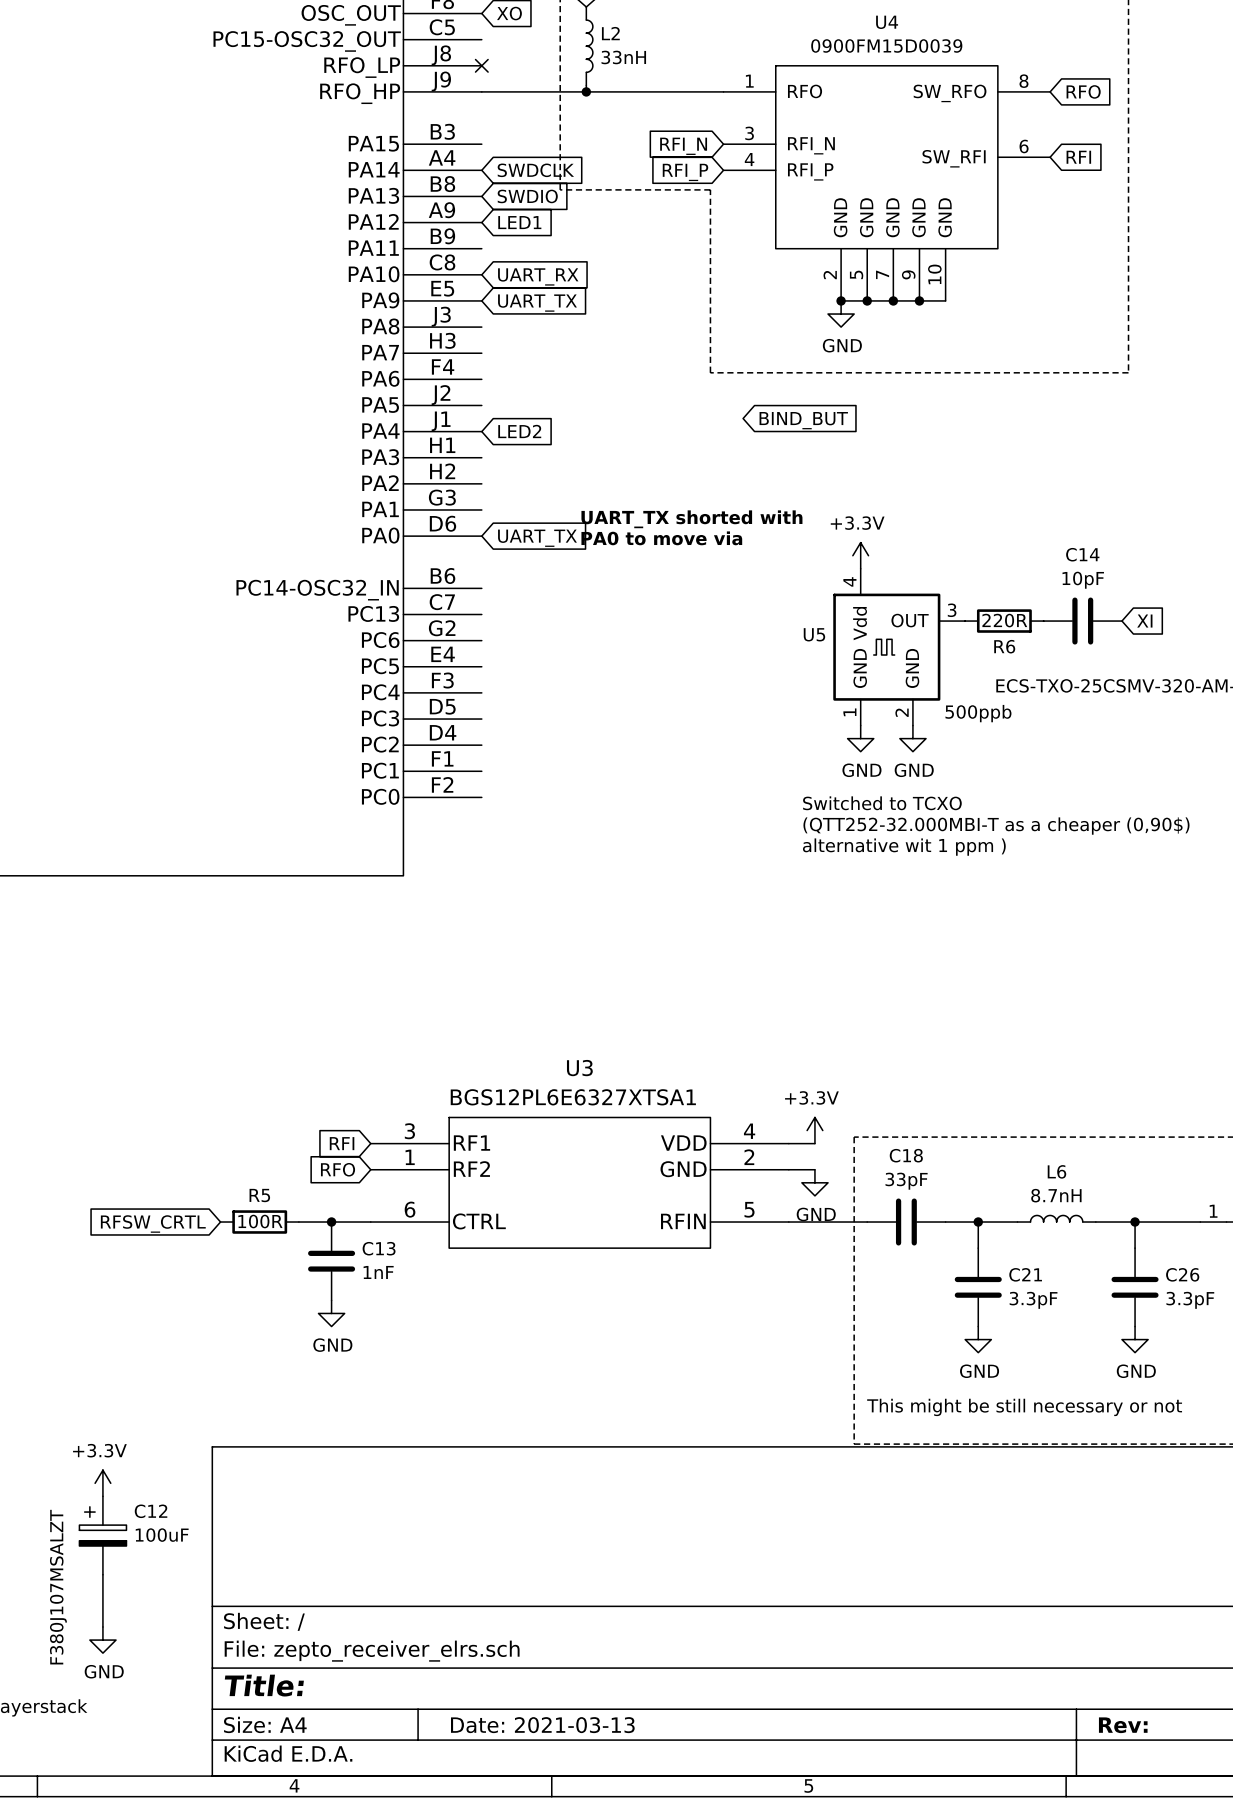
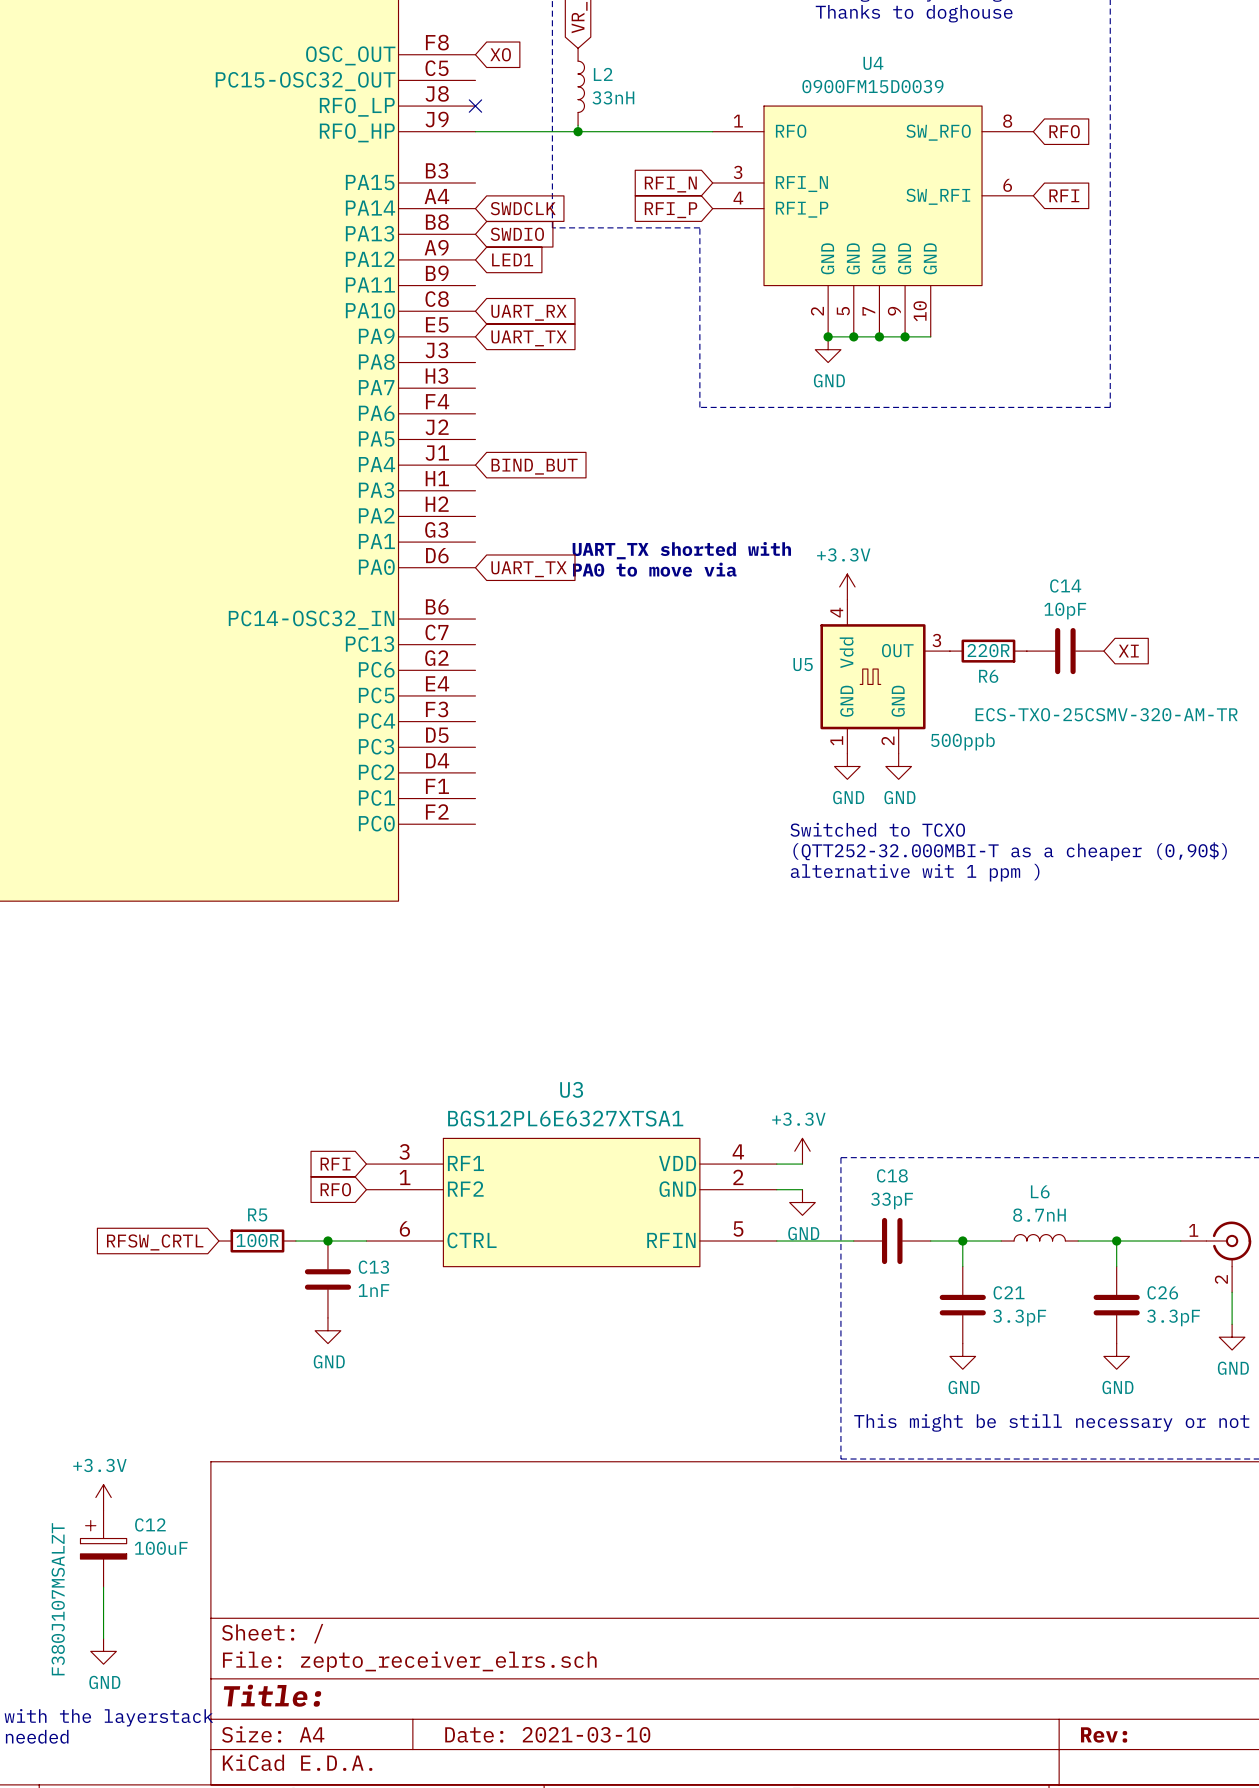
global label: BIND_BUT (803, 420) -> none
global label: LED2 (519, 431) -> BIND_BUT (534, 466)
title block: Date: 2021-03-13 (542, 1725) -> Date: 2021-03-10 (547, 1734)

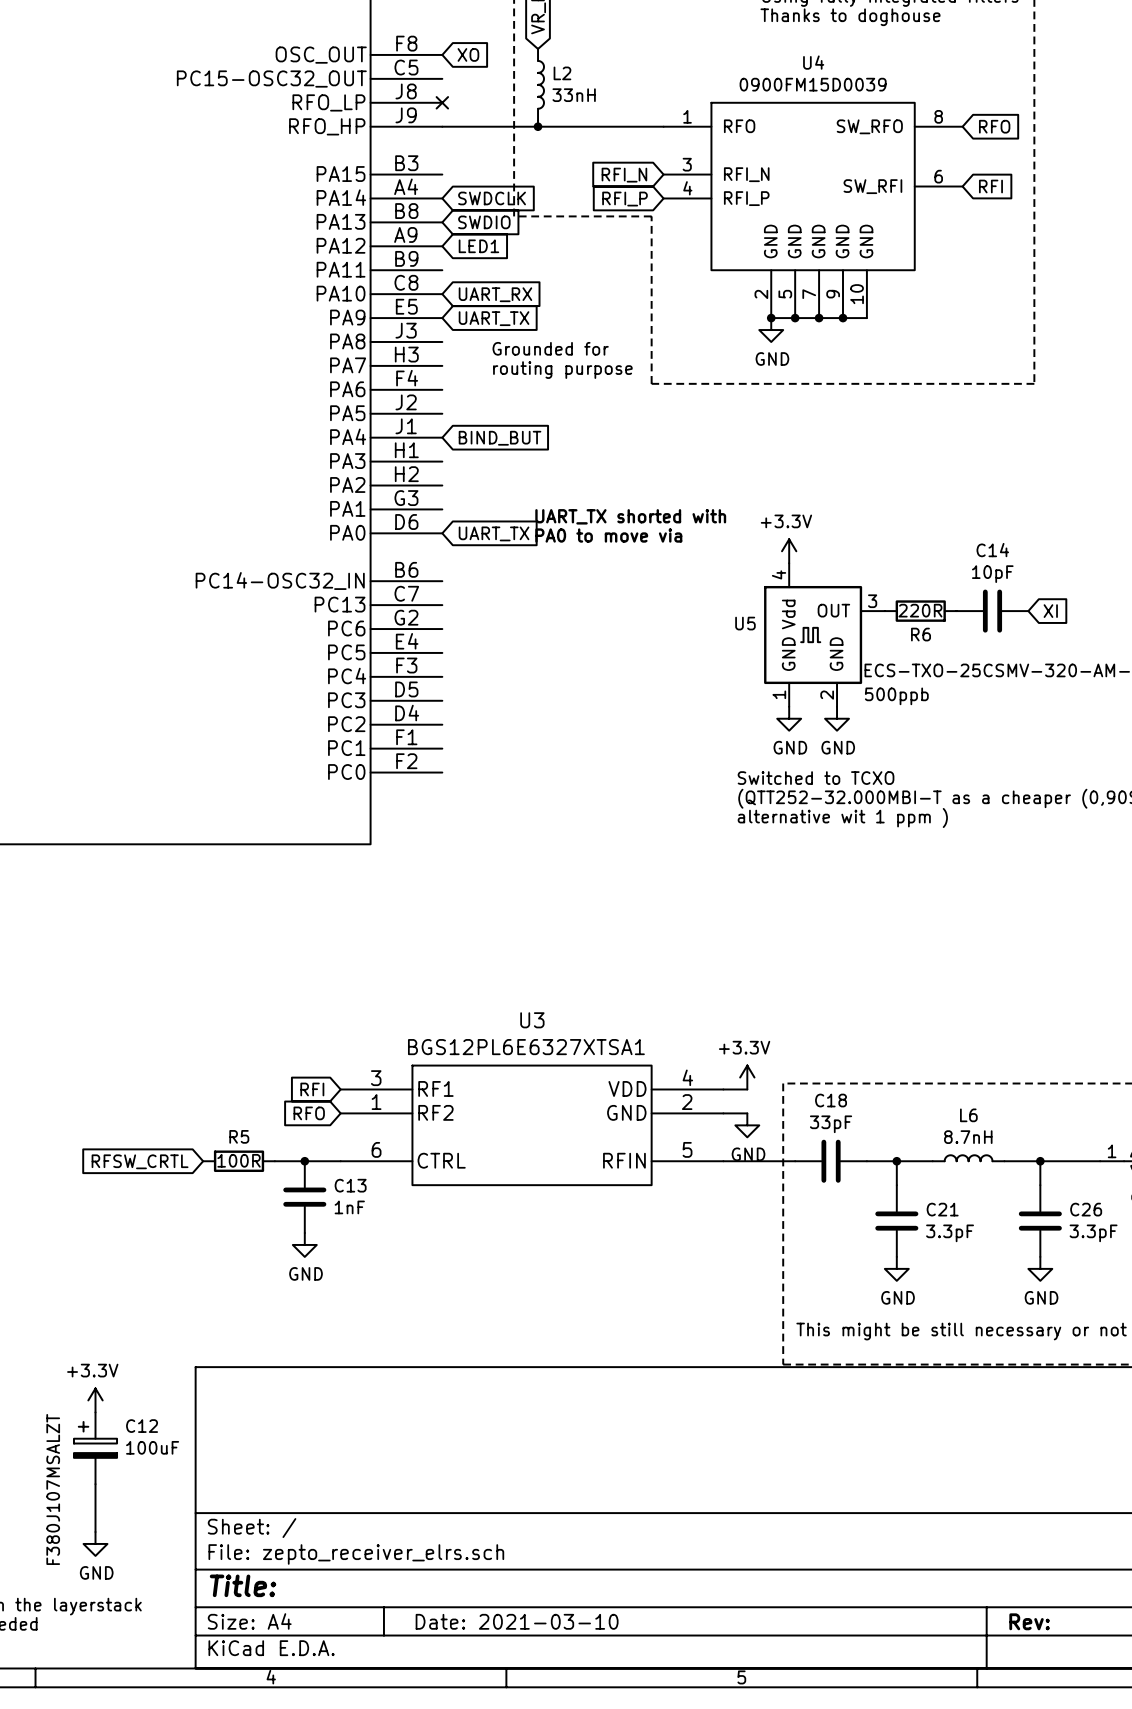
text: none -> Grounded for (550, 348)
text: none -> routing purpose (562, 370)

